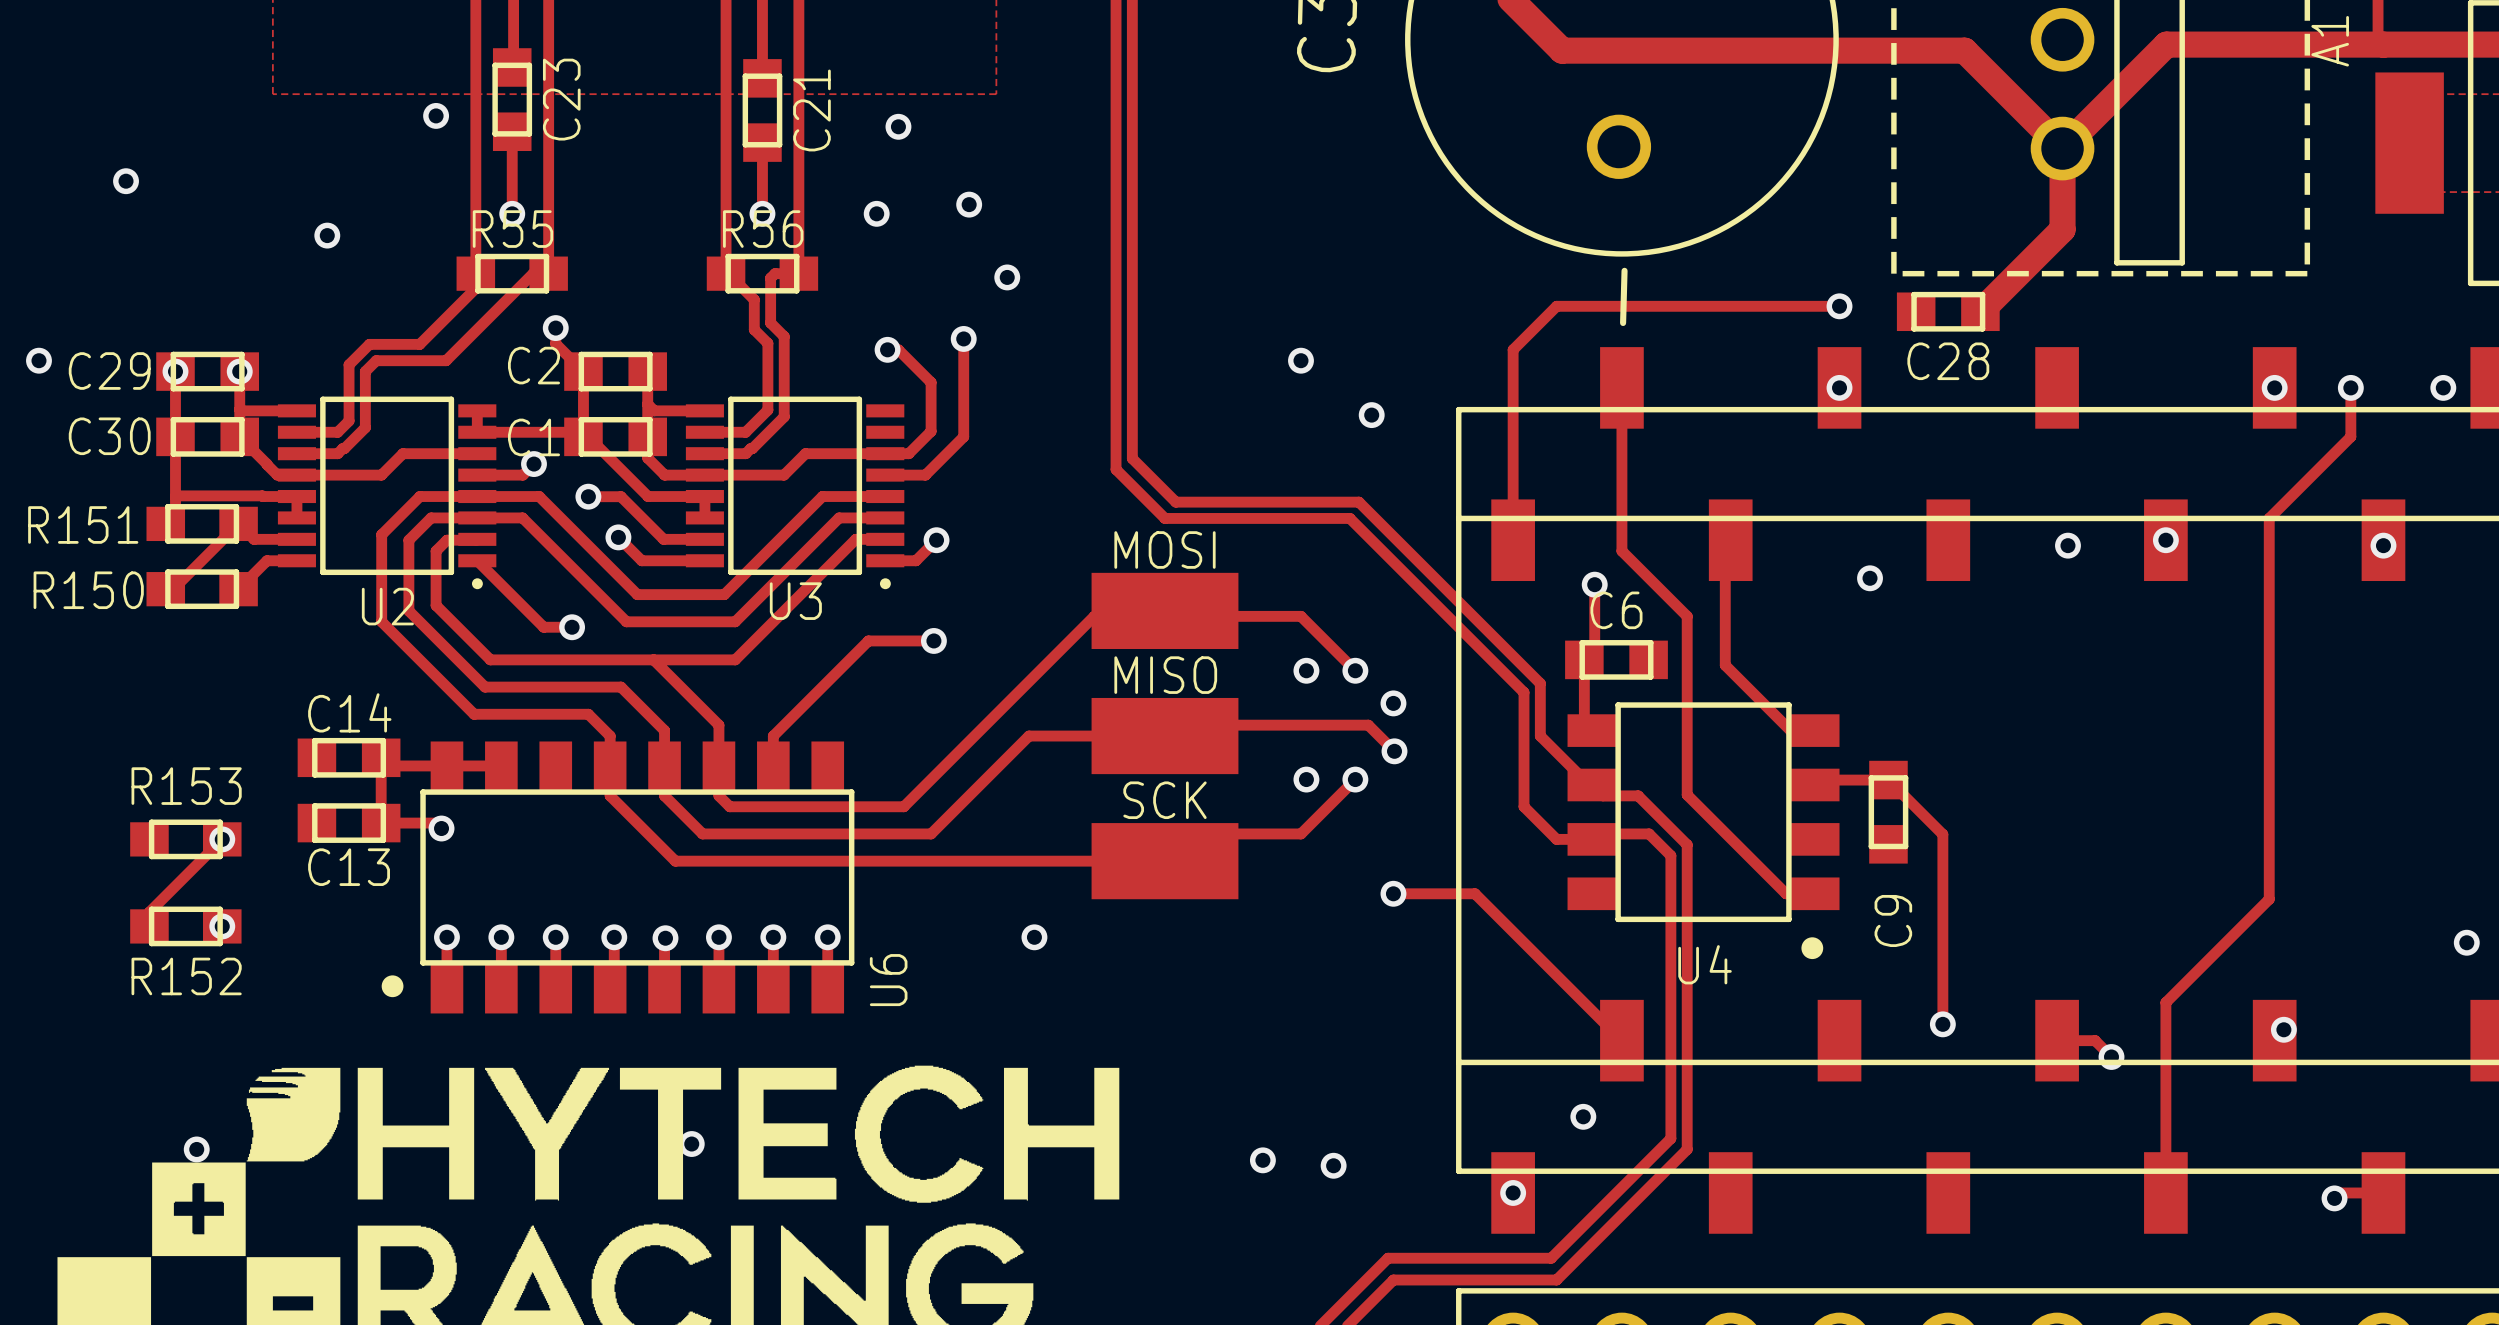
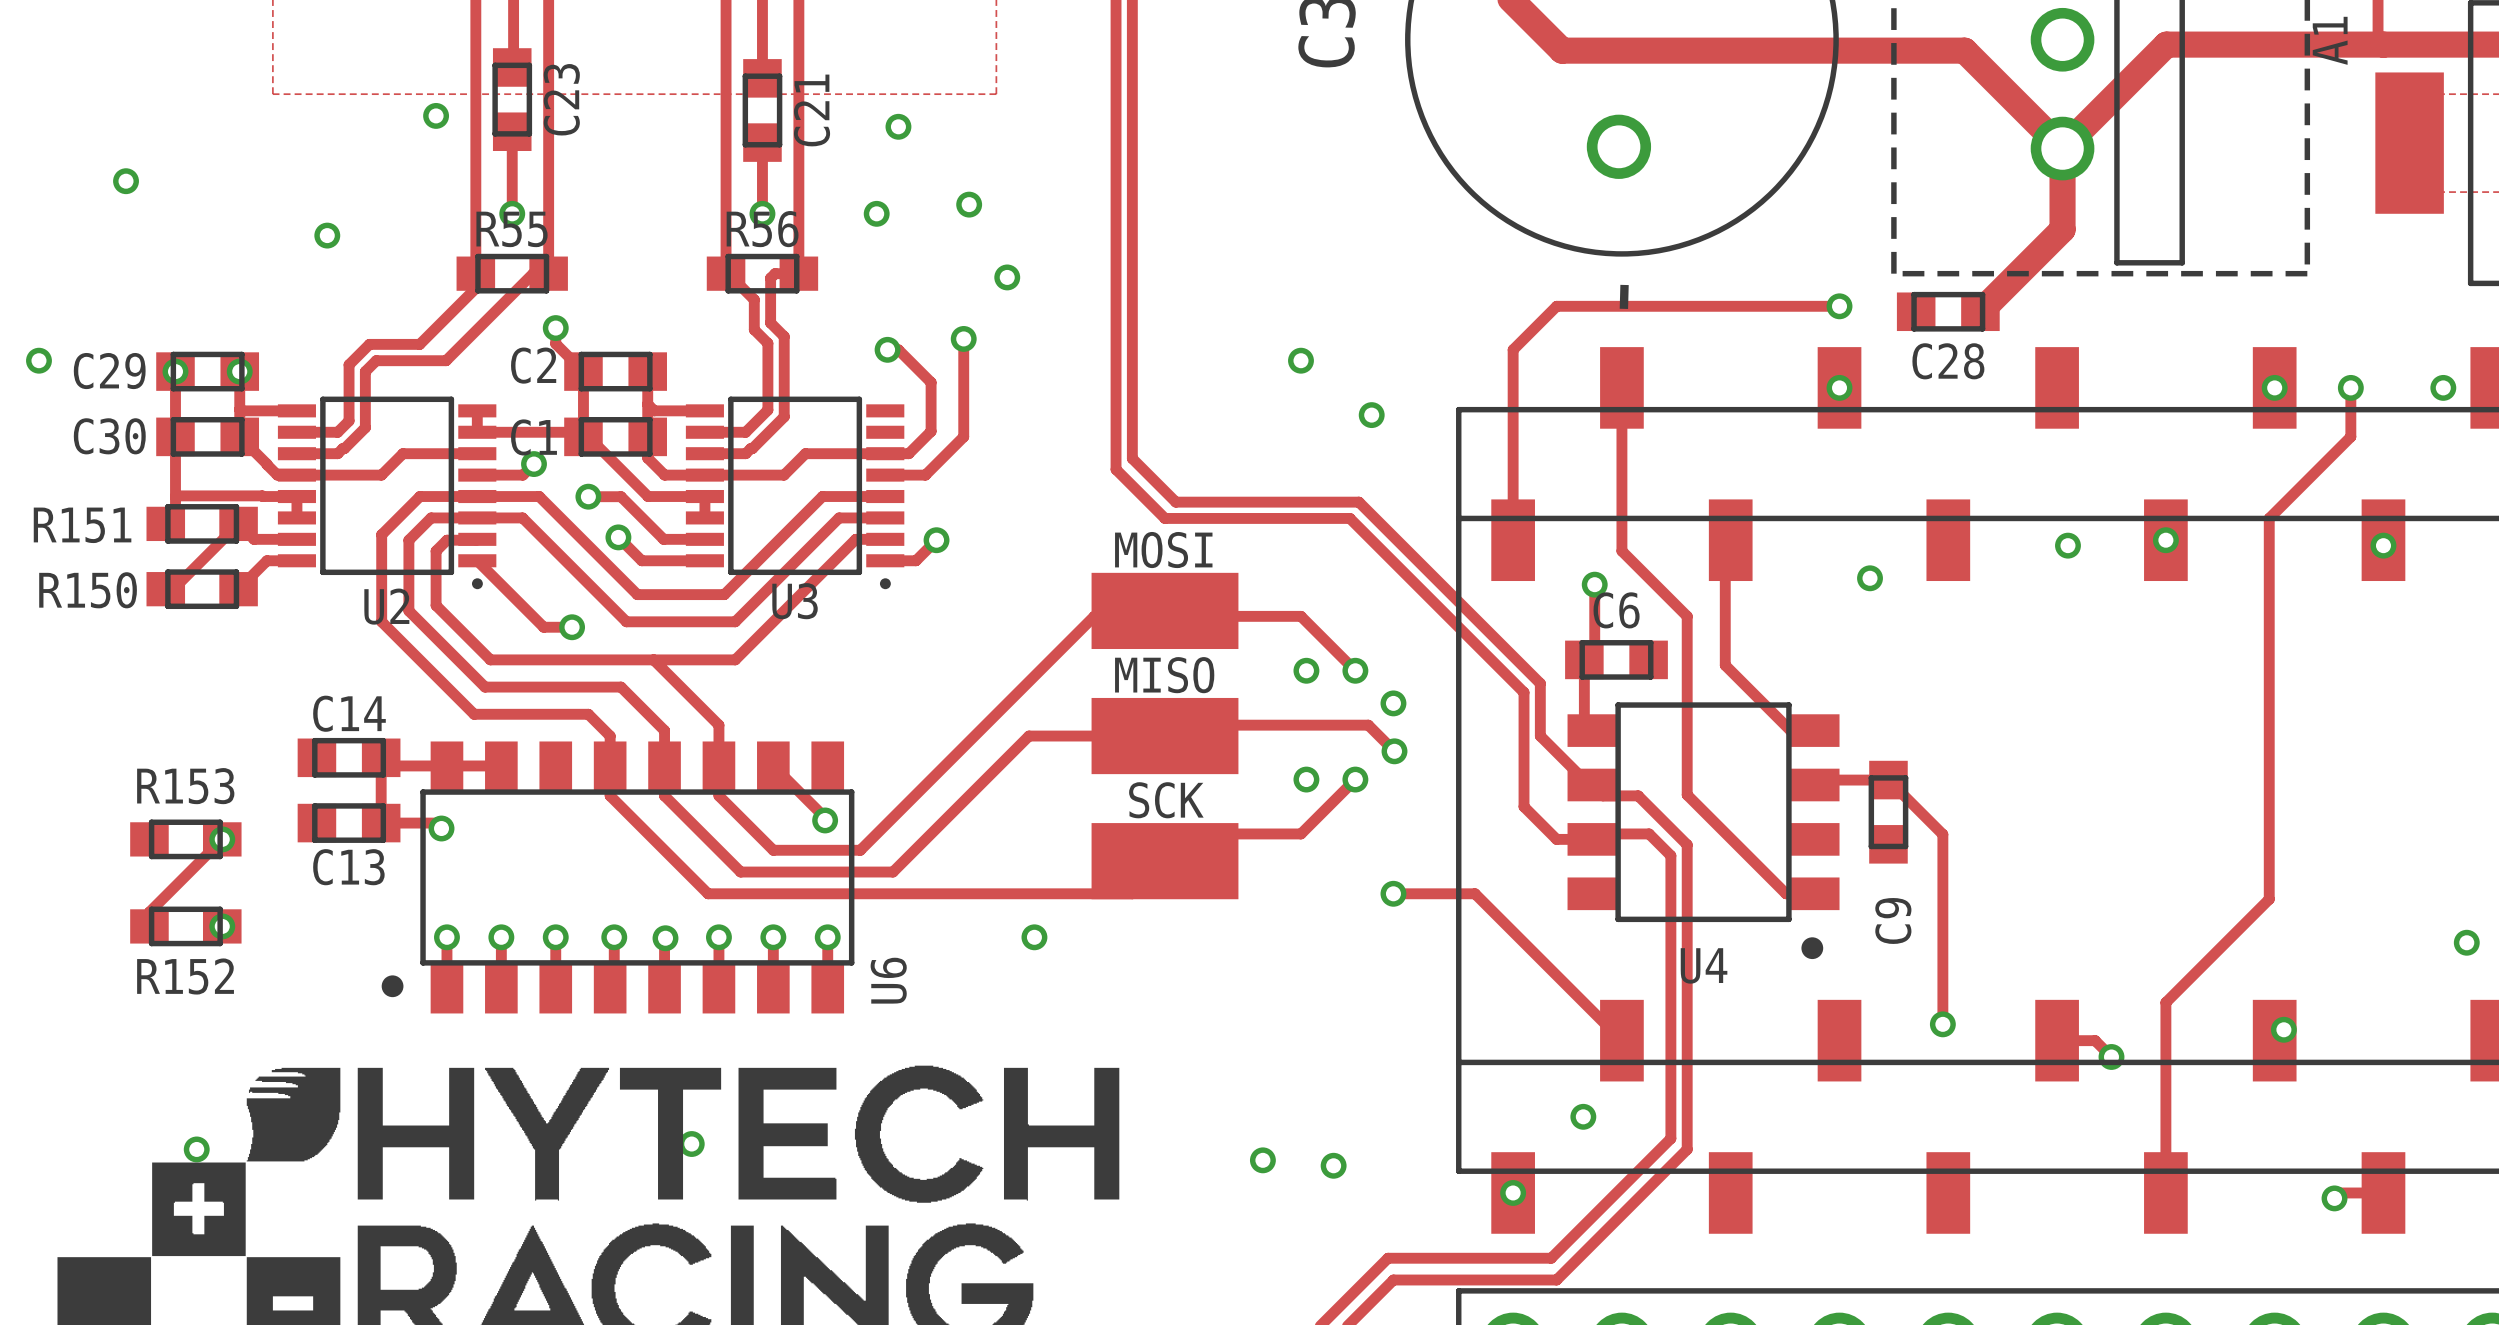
track: (933, 640) (868, 640) (773, 736) (773, 765) -> (825, 820) (825, 817) (773, 765)
via position: (933, 640) -> (825, 820)
track: (729, 806) (903, 806) -> (729, 806) (773, 850) (860, 850) (903, 806)
track: (702, 833) (931, 833) -> (702, 833) (740, 872) (893, 872) (931, 833)
track: (675, 861) (1165, 861) -> (675, 861) (708, 893) (1132, 893) (1165, 861)

